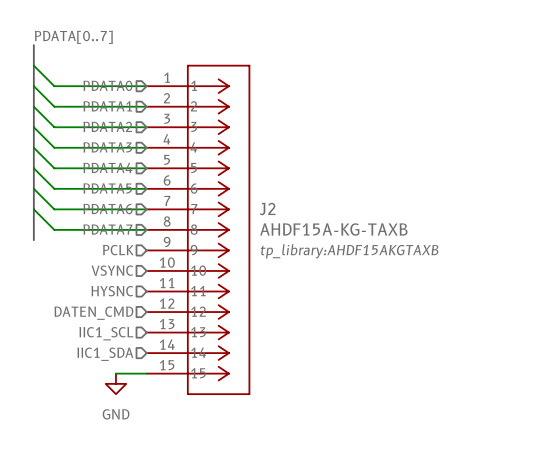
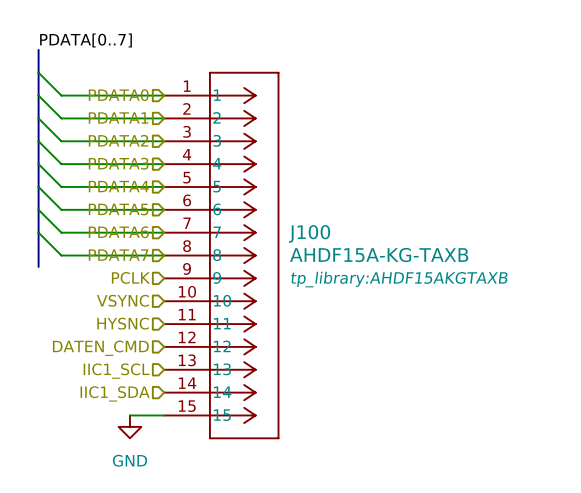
J2 name: J2 (267, 208) -> J100 (309, 233)

